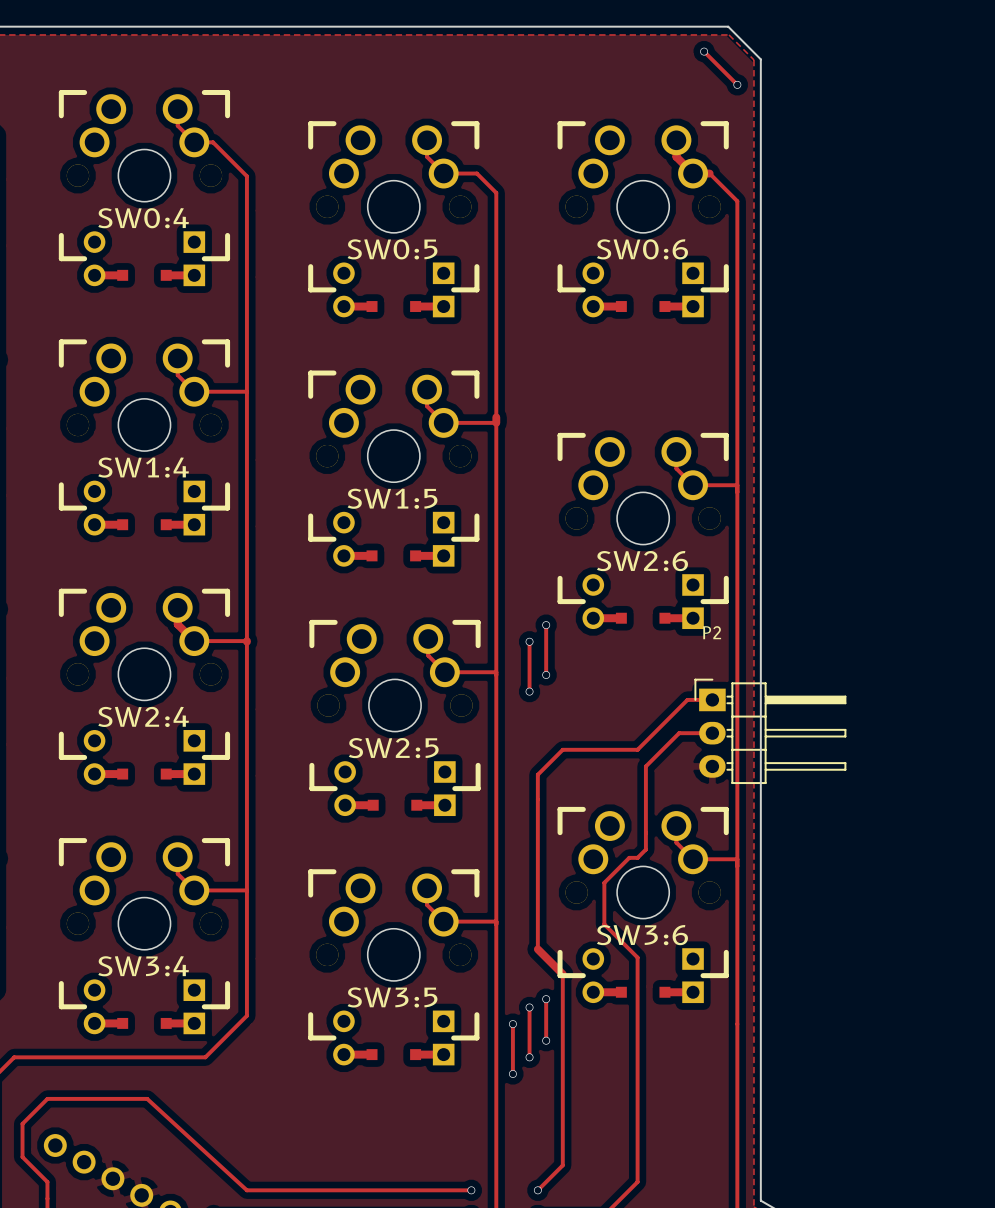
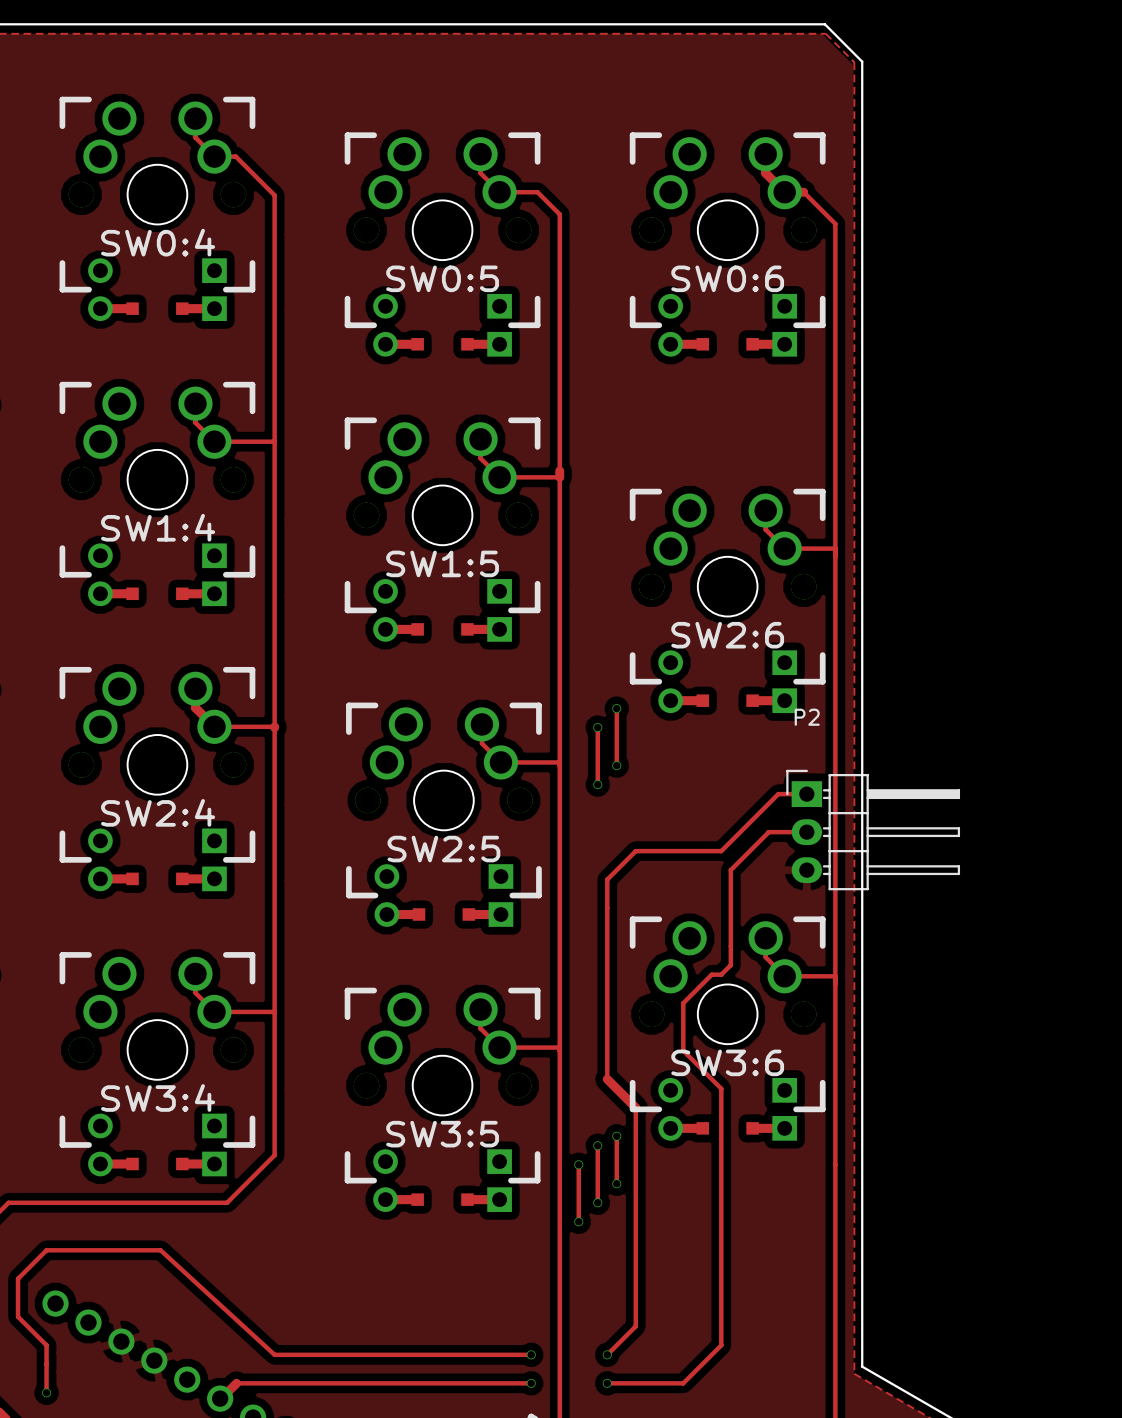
track: (704, 51) (737, 84) -> none
via: (704, 51) -> none
via: (737, 84) -> none

